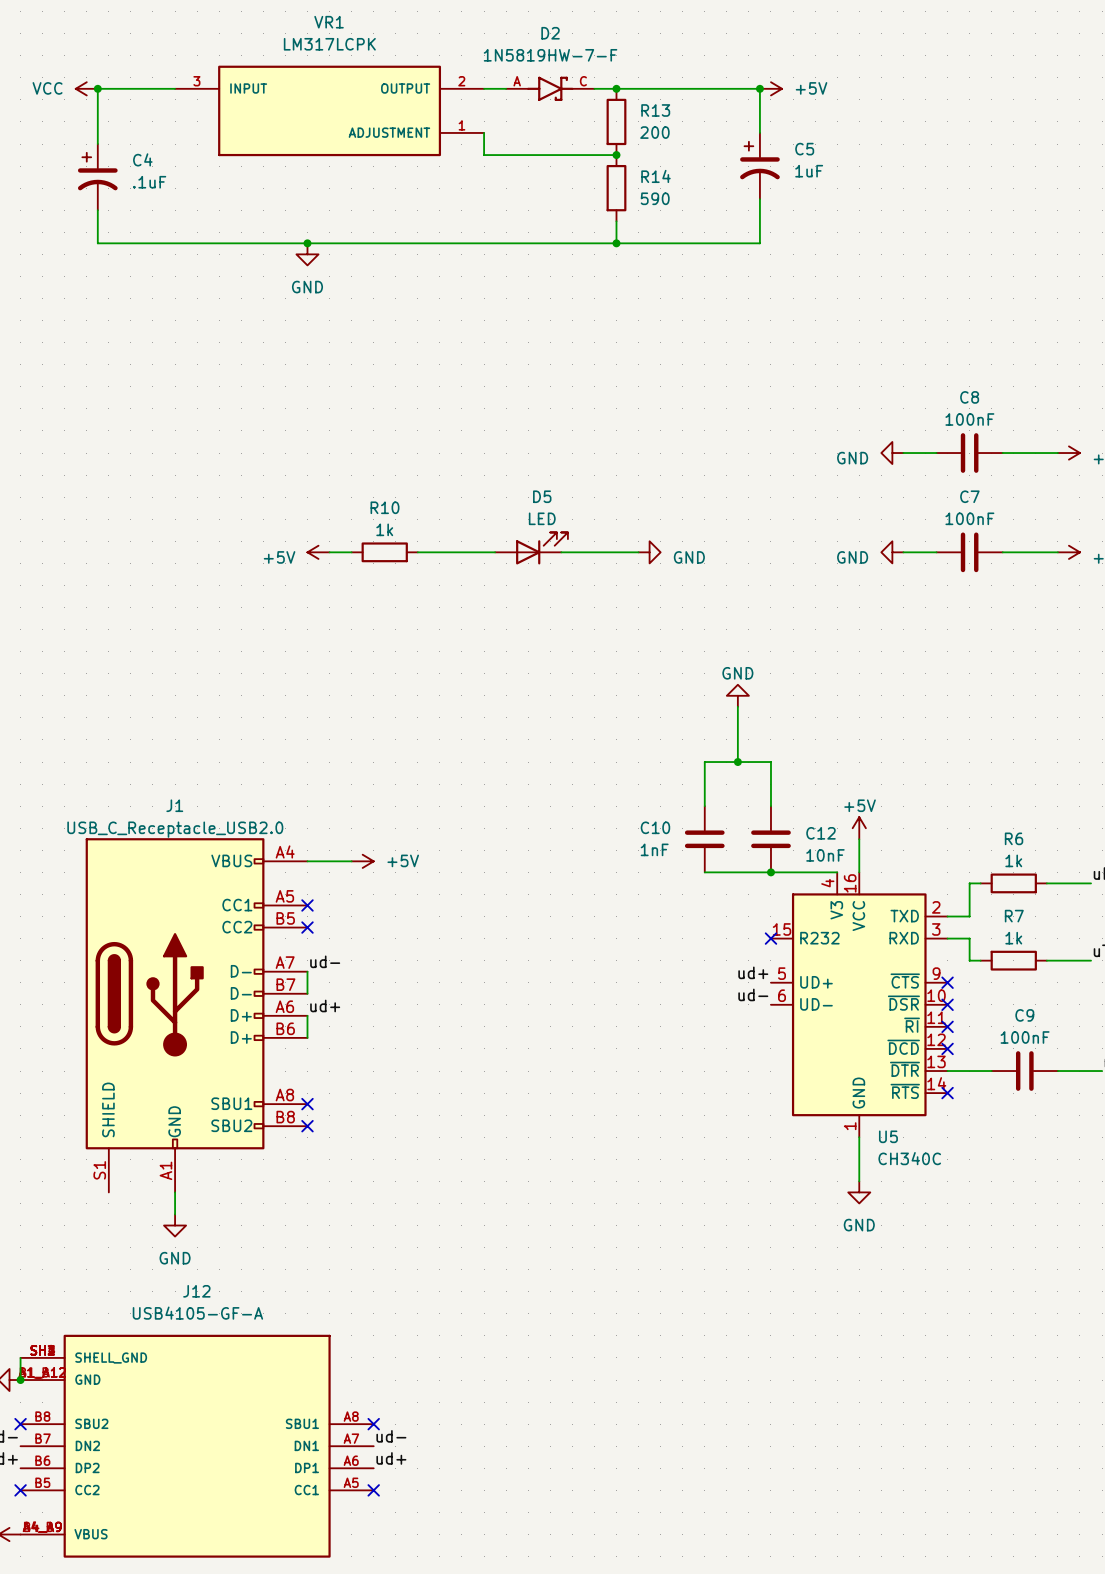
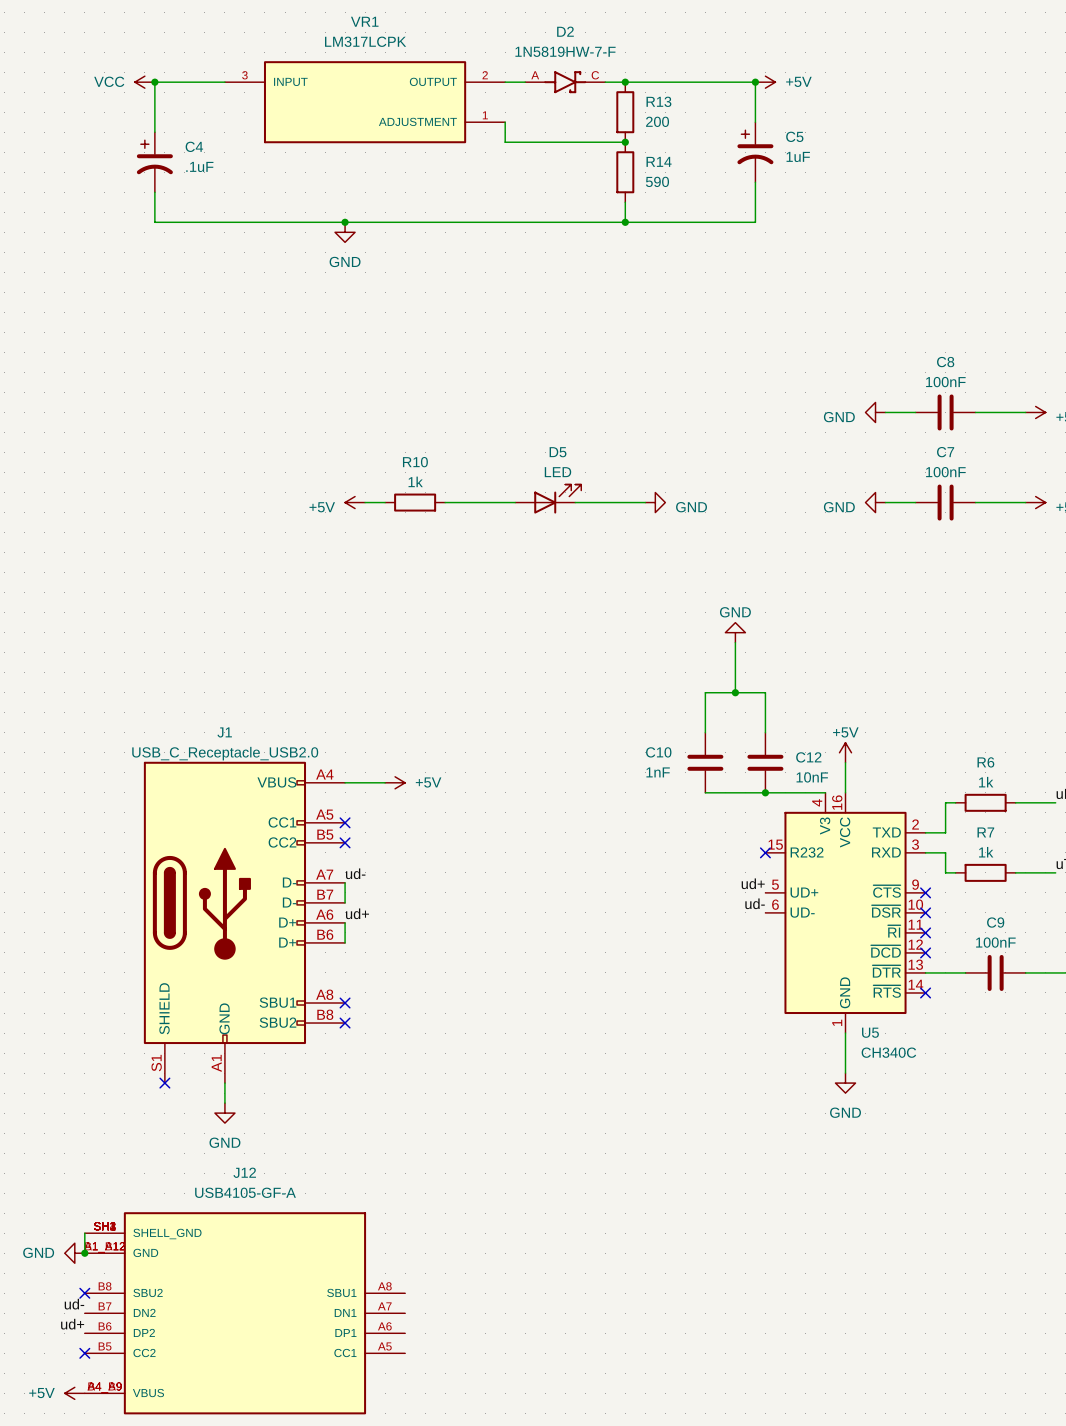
no-connect mark: none -> (164, 1083)
no-connect mark: (373, 1424) -> none
label: ud- (391, 1436) -> none
label: ud+ (391, 1458) -> none
no-connect mark: (373, 1490) -> none

